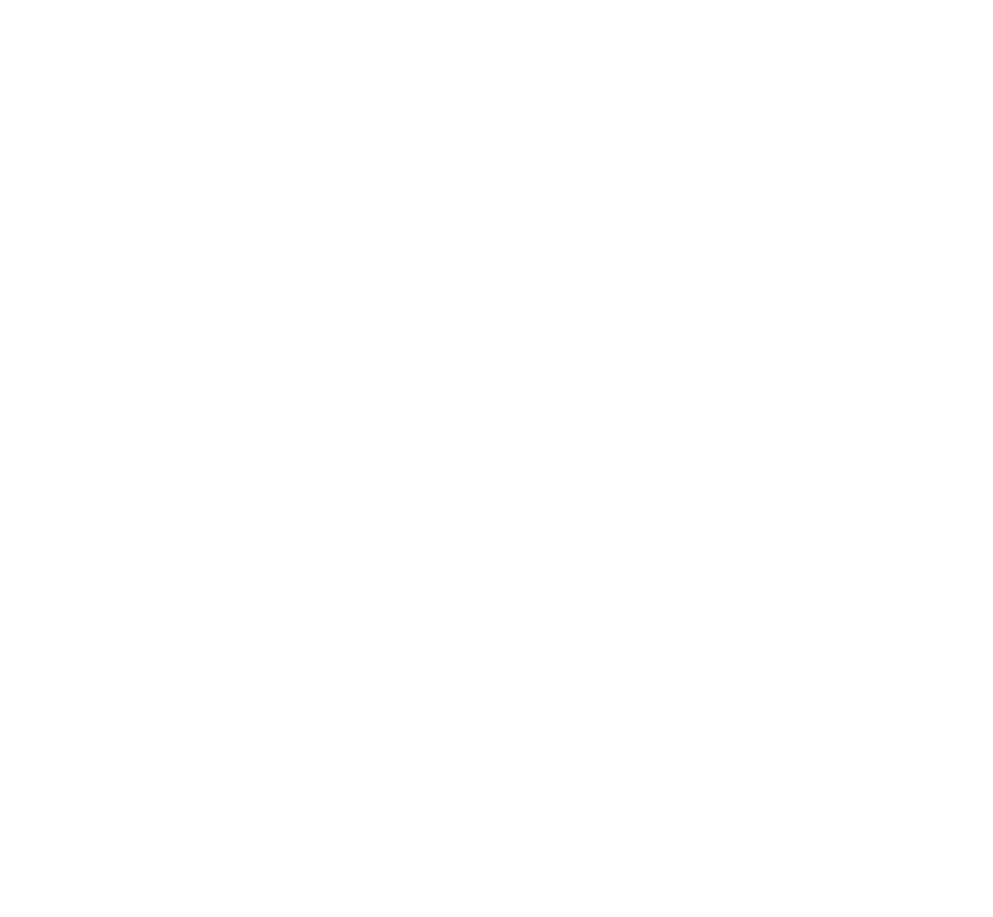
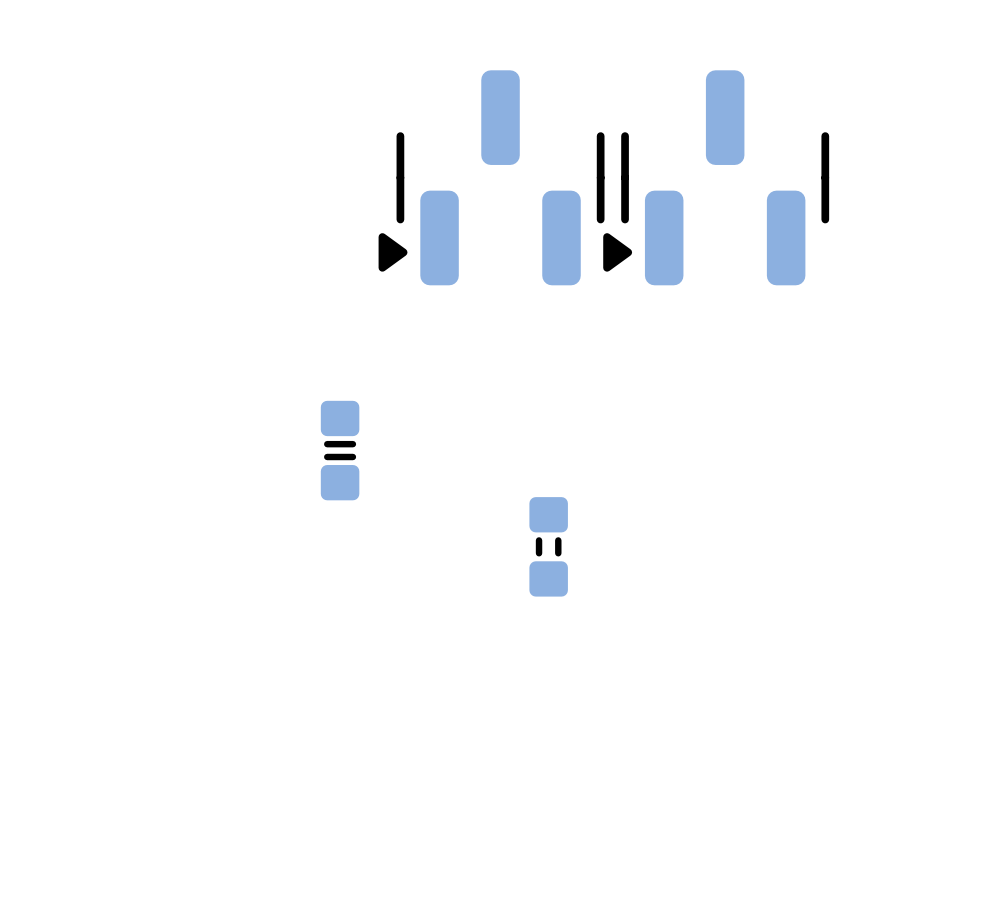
part: none -> (491, 177)
part: none -> (716, 177)
part: none -> (340, 450)
part: none -> (548, 546)

